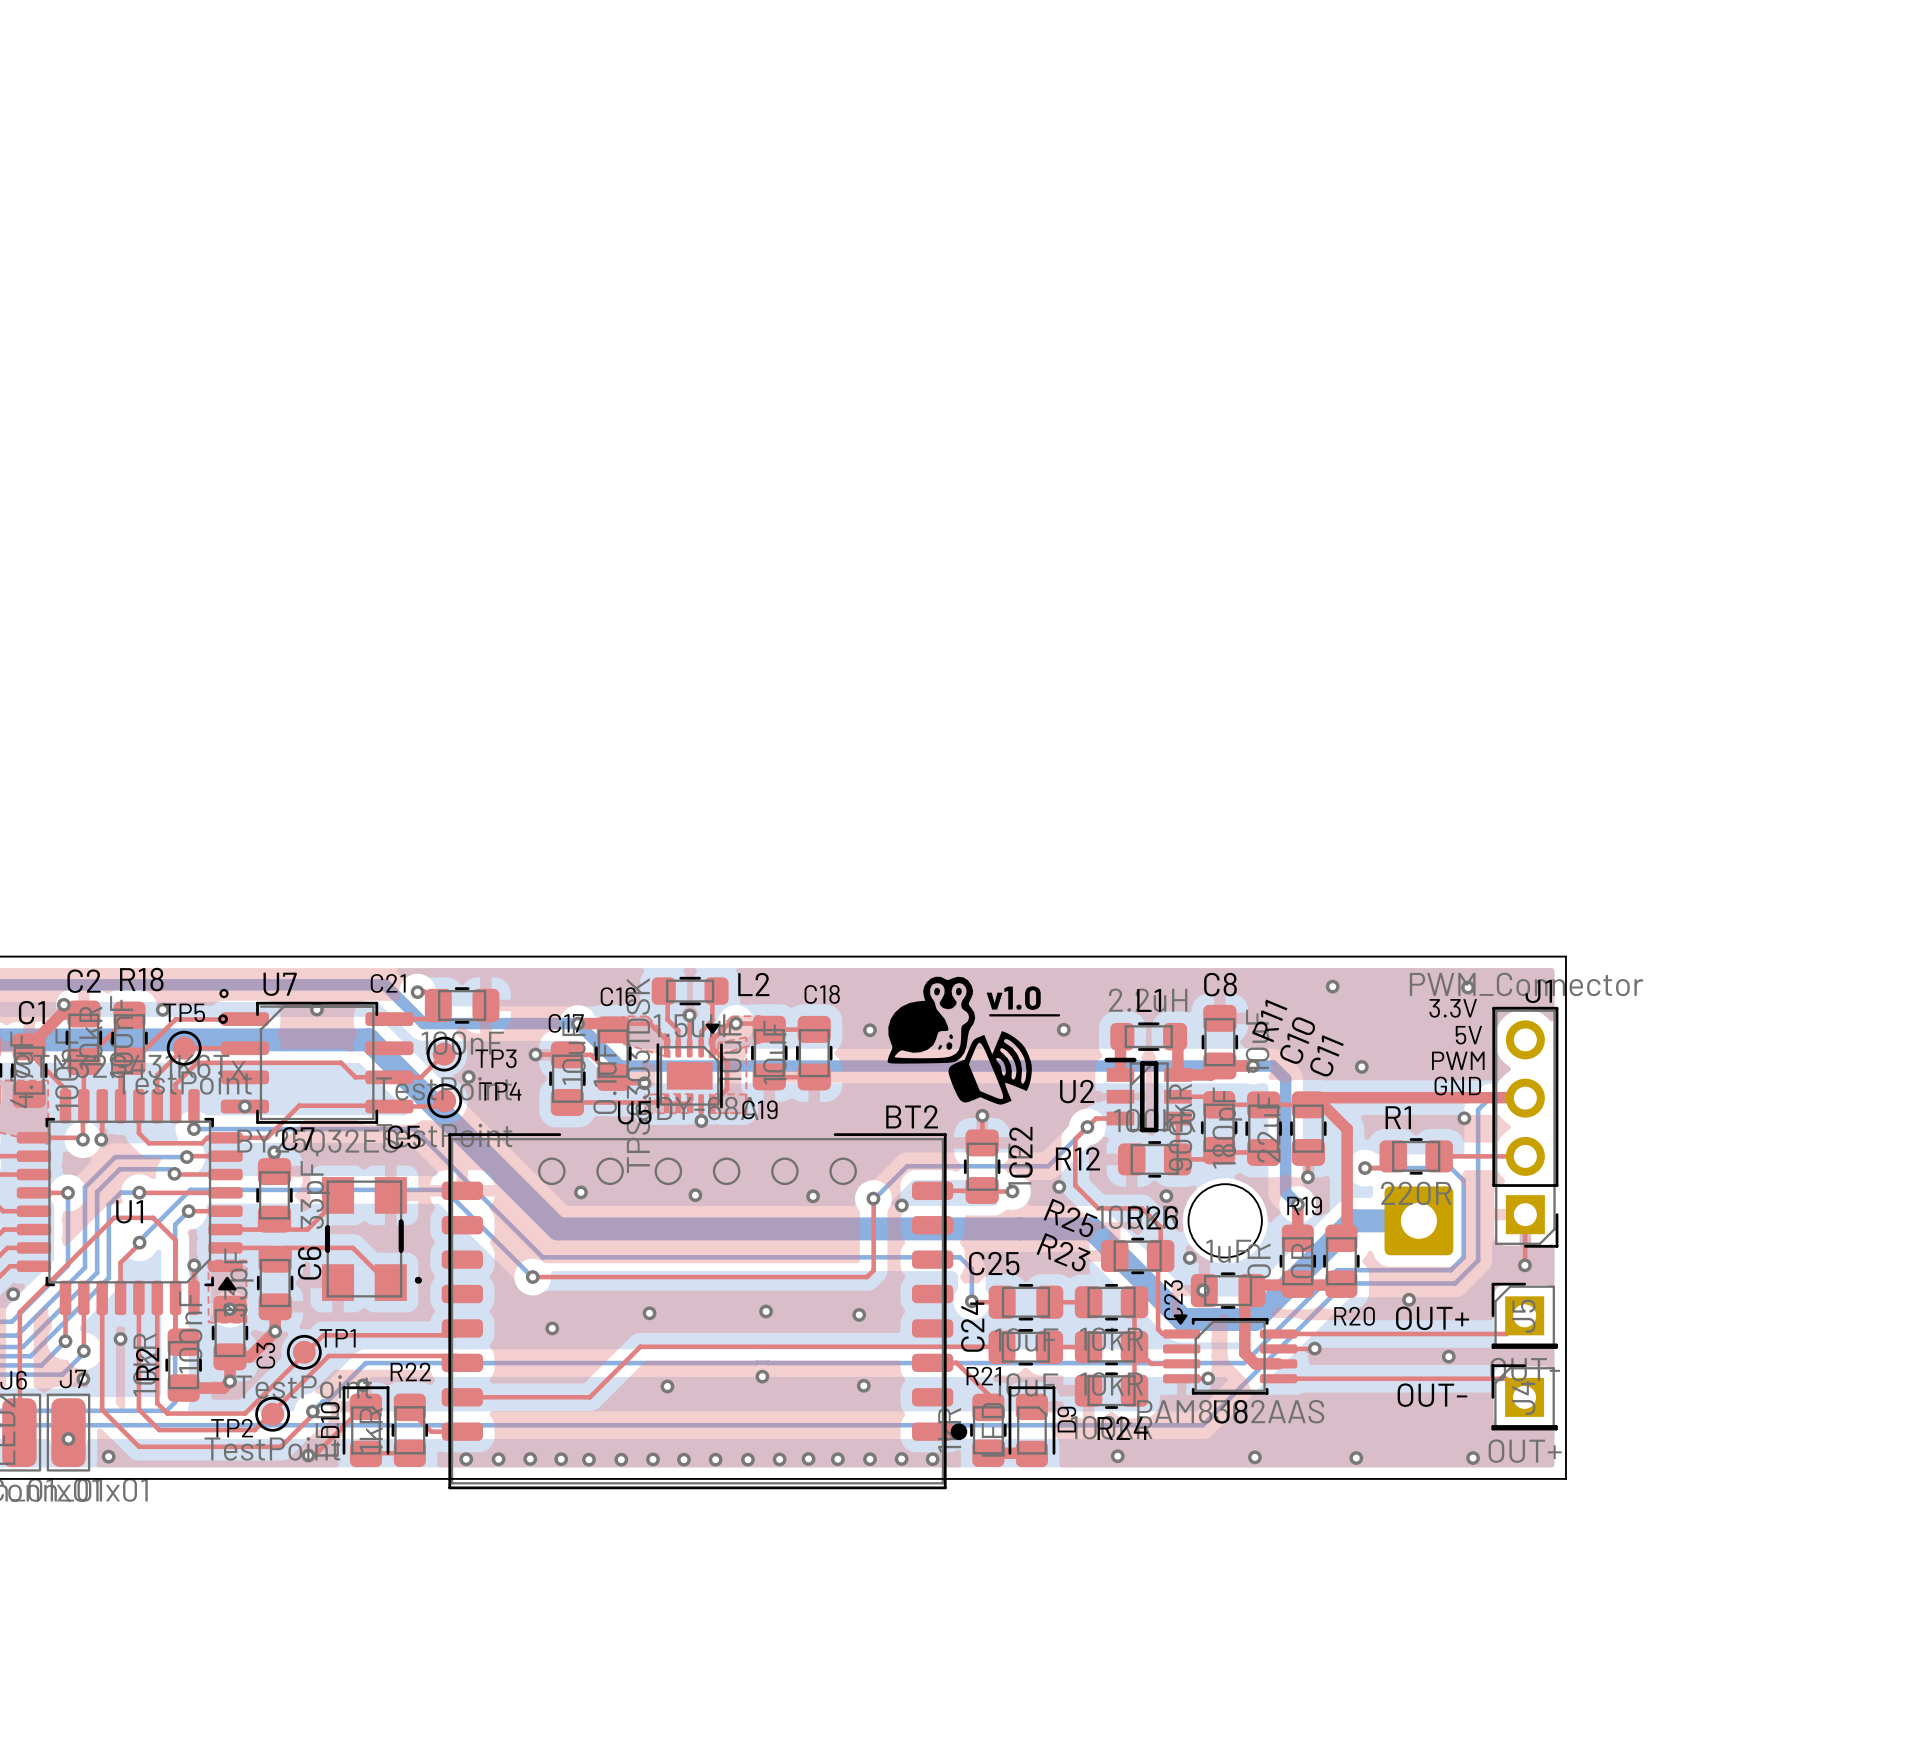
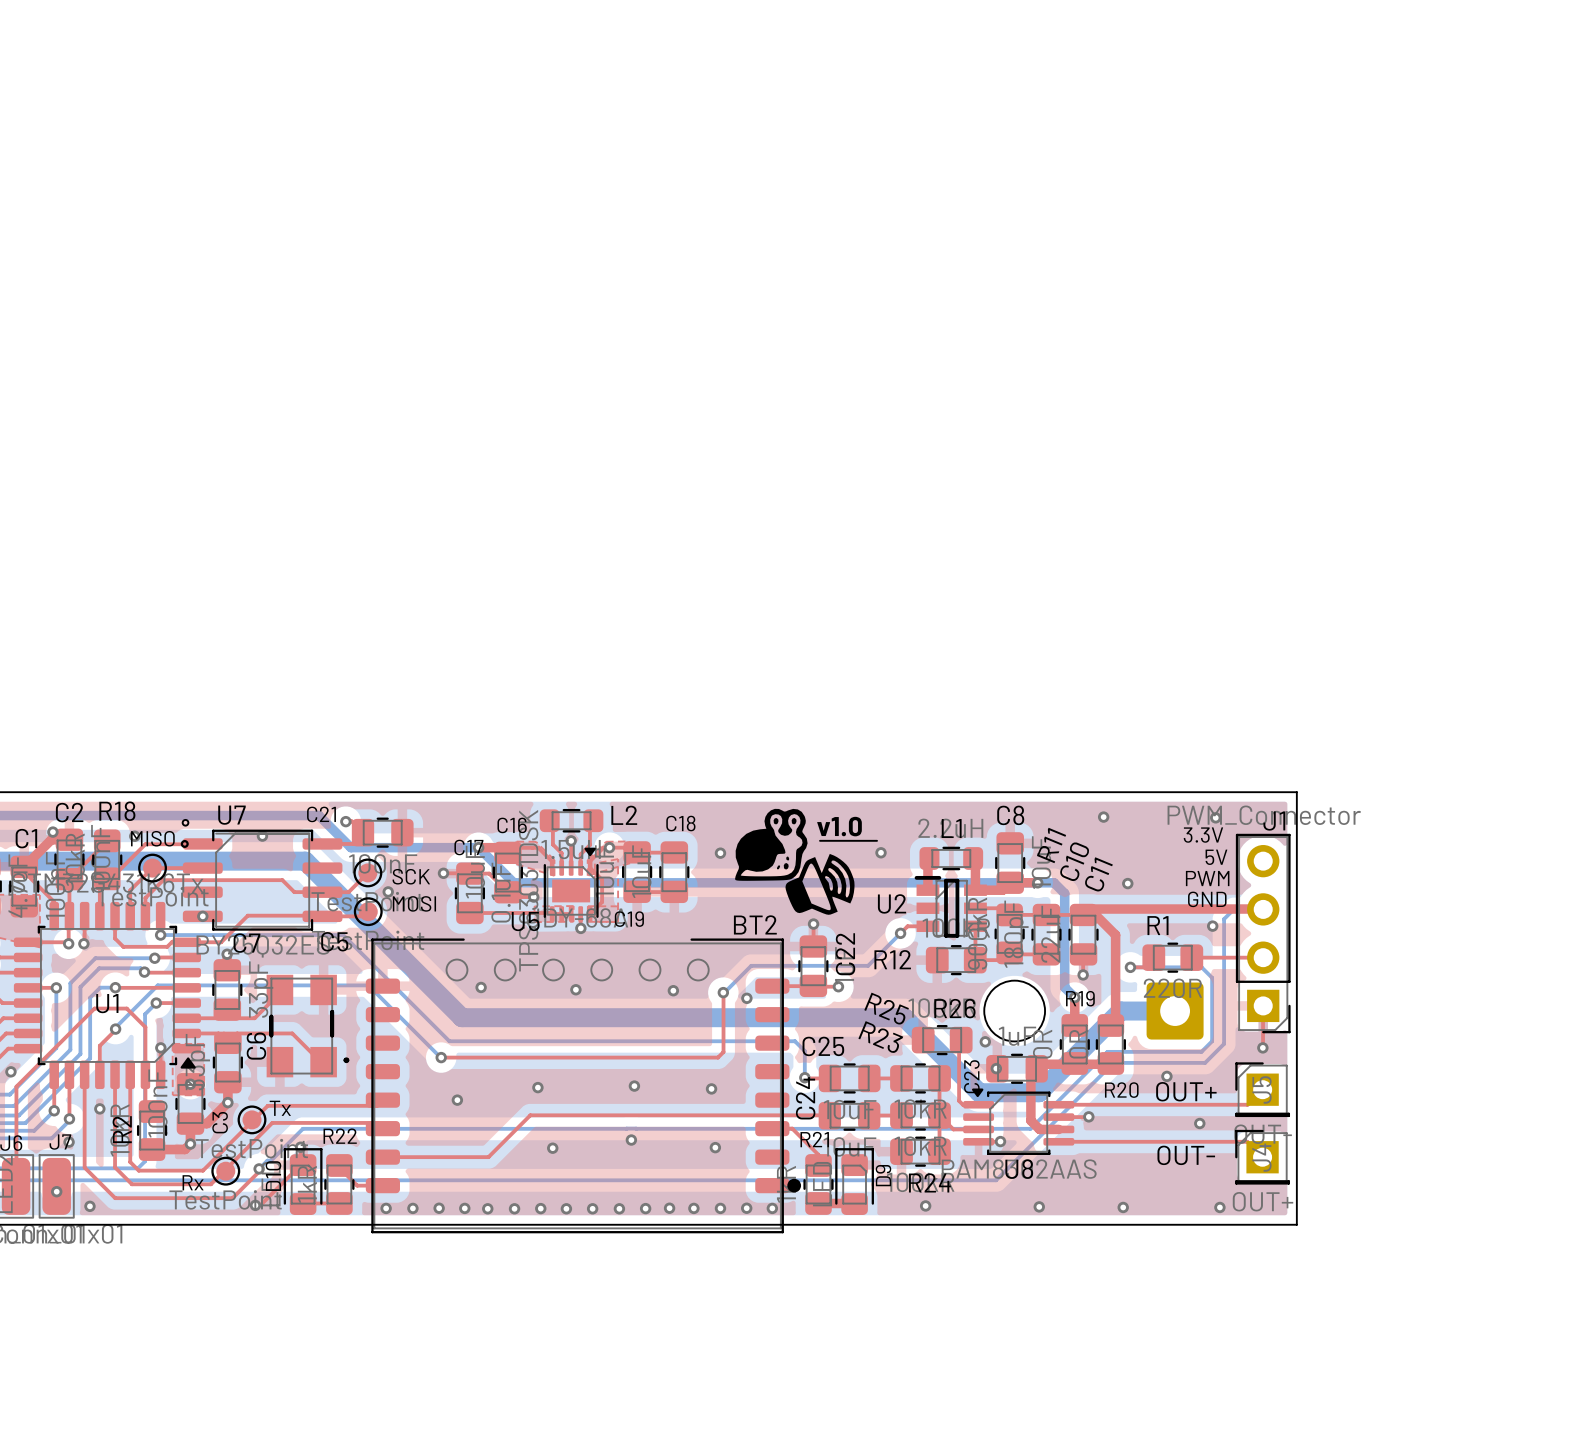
TP5 name: TP5 (184, 1012) -> MISO (152, 838)
TP3 name: TP3 (496, 1058) -> SCK (411, 876)
TP4 name: TP4 (500, 1091) -> MOSI (414, 903)
top track: (1087, 1127) (1075, 1139) (1075, 1185) (1098, 1208) (1142, 1208) (1160, 1227) (1160, 1255) -> none
via: (1059, 1186) -> none
via: (1166, 1196) -> none
TP1 name: TP1 (337, 1338) -> Tx (280, 1108)
TP2 name: TP2 (232, 1428) -> Rx (193, 1182)

